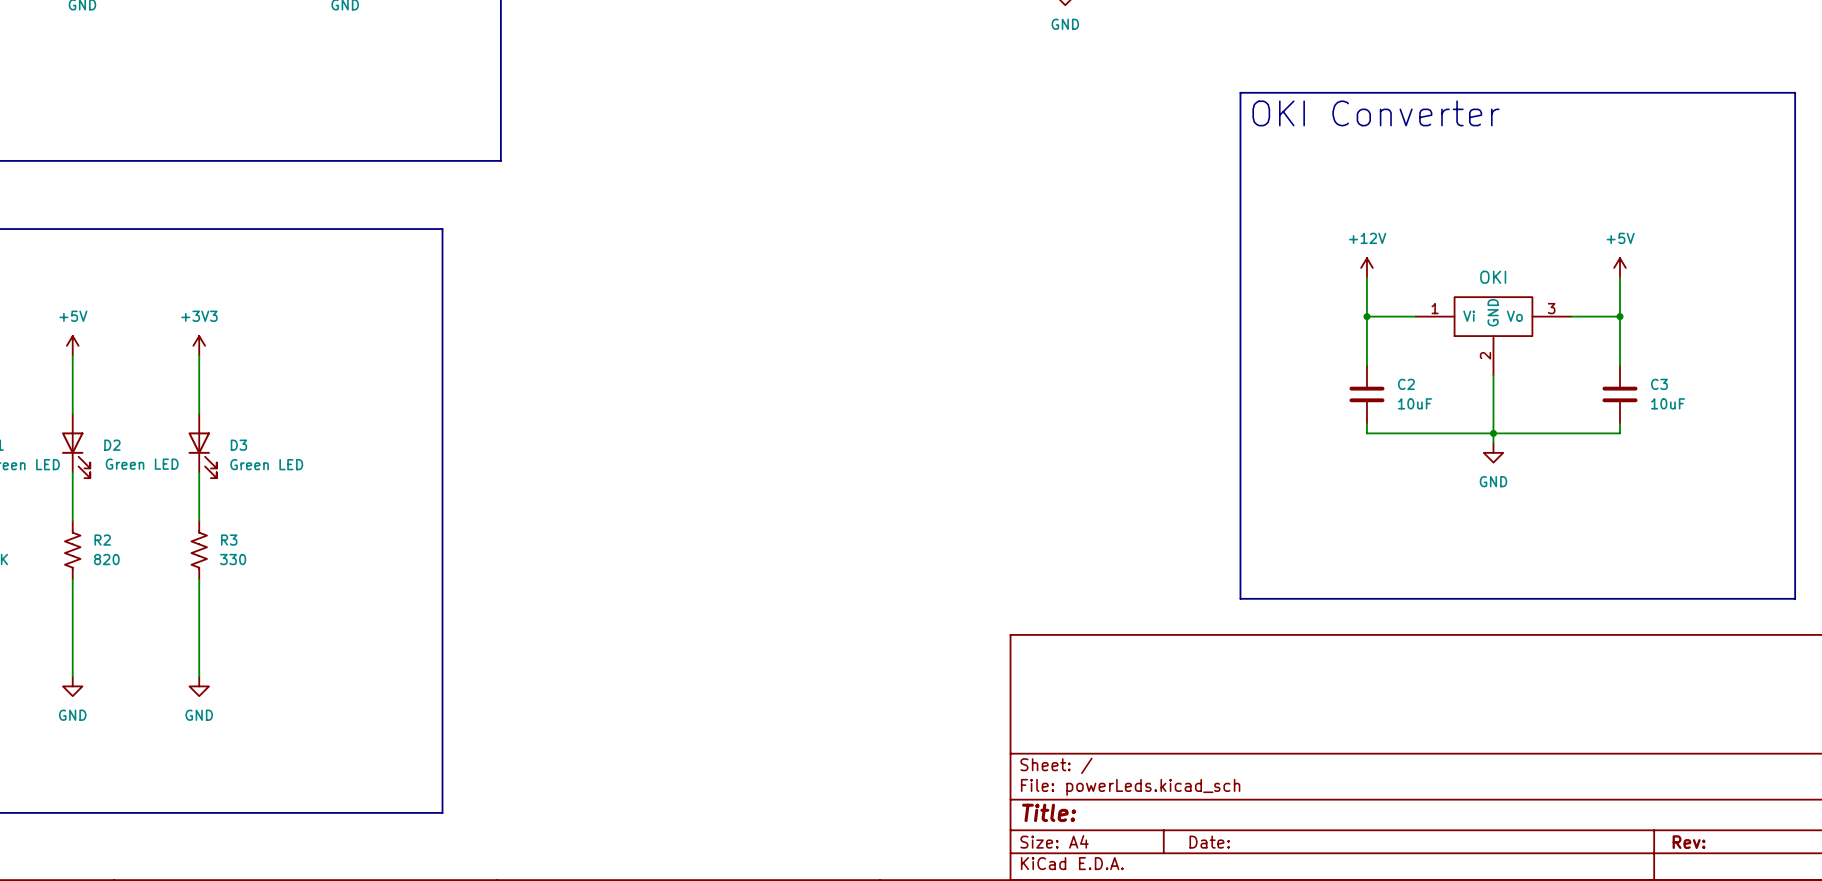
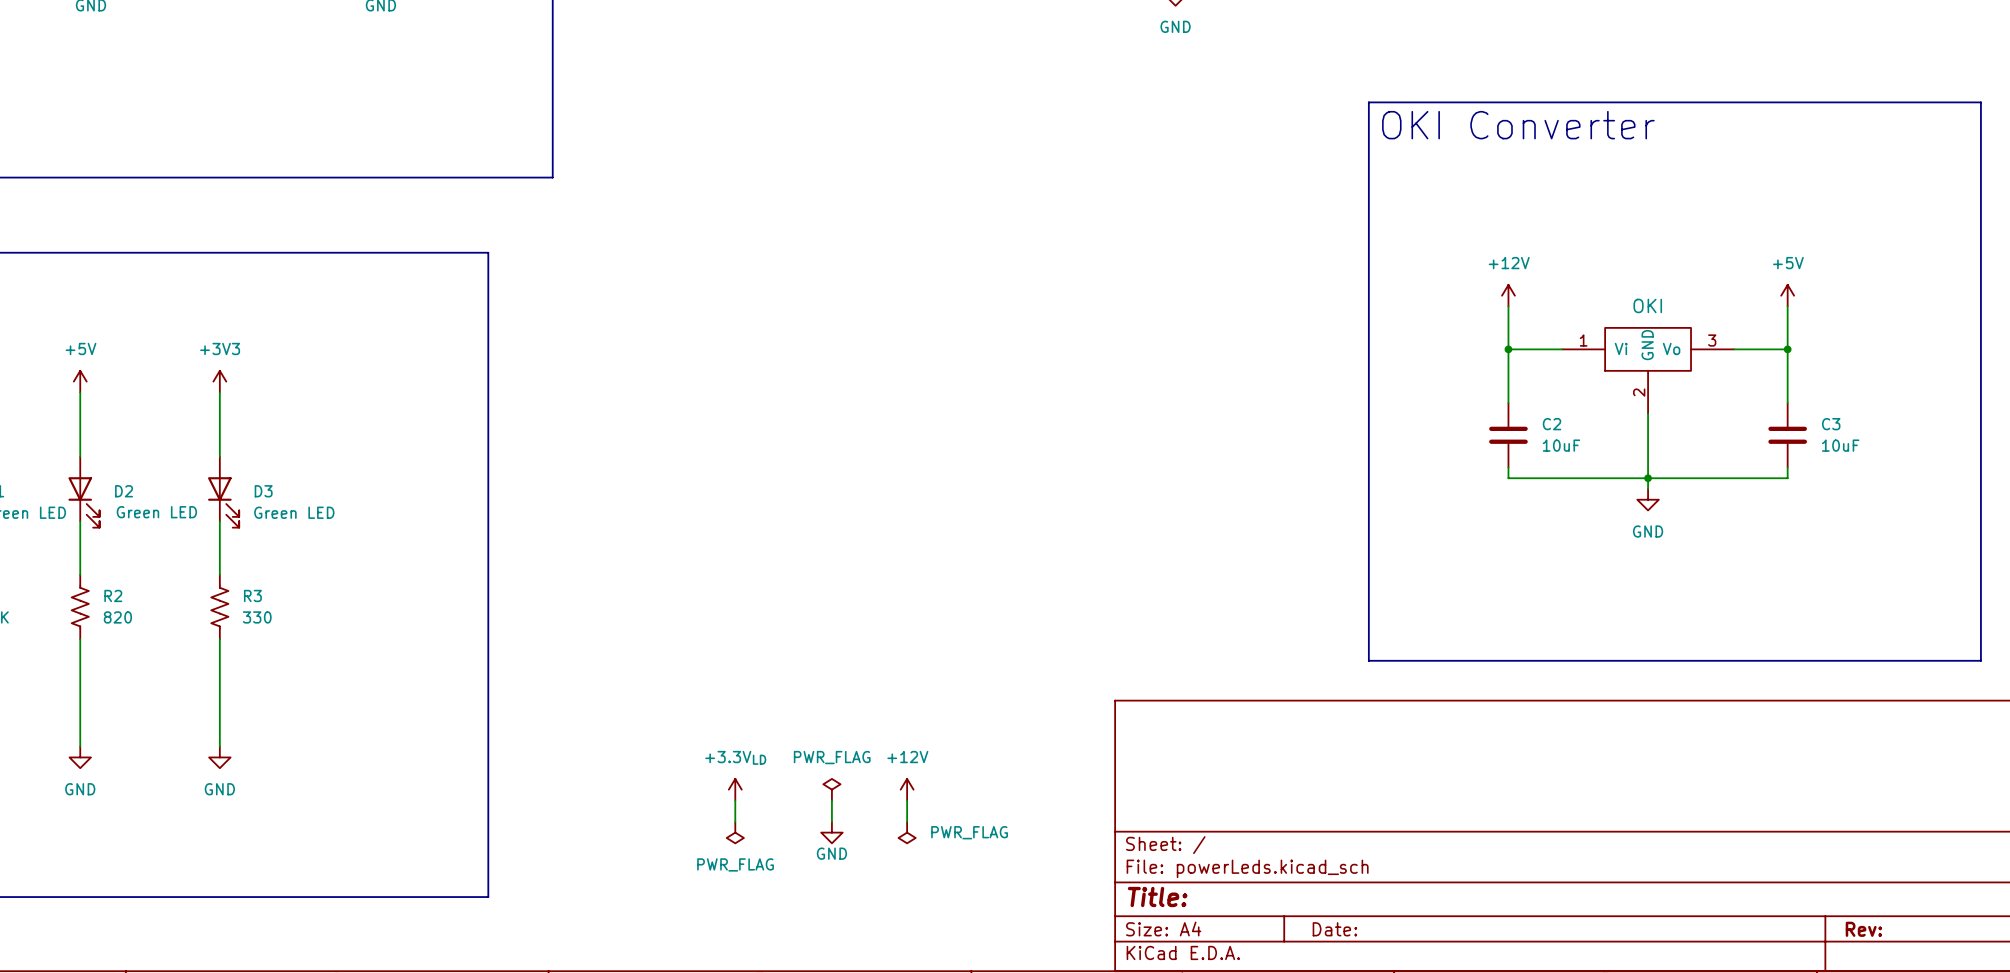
power symbol: none -> +3.3VLD (735, 789)
power symbol: none -> PWR_FLAG (831, 789)
power symbol: none -> +12V (907, 789)
wire: none -> (735, 800) (735, 821)
wire: none -> (831, 800) (831, 821)
wire: none -> (907, 800) (907, 821)
power symbol: none -> PWR_FLAG (735, 832)
power symbol: none -> GND (831, 832)
power symbol: none -> PWR_FLAG (907, 832)

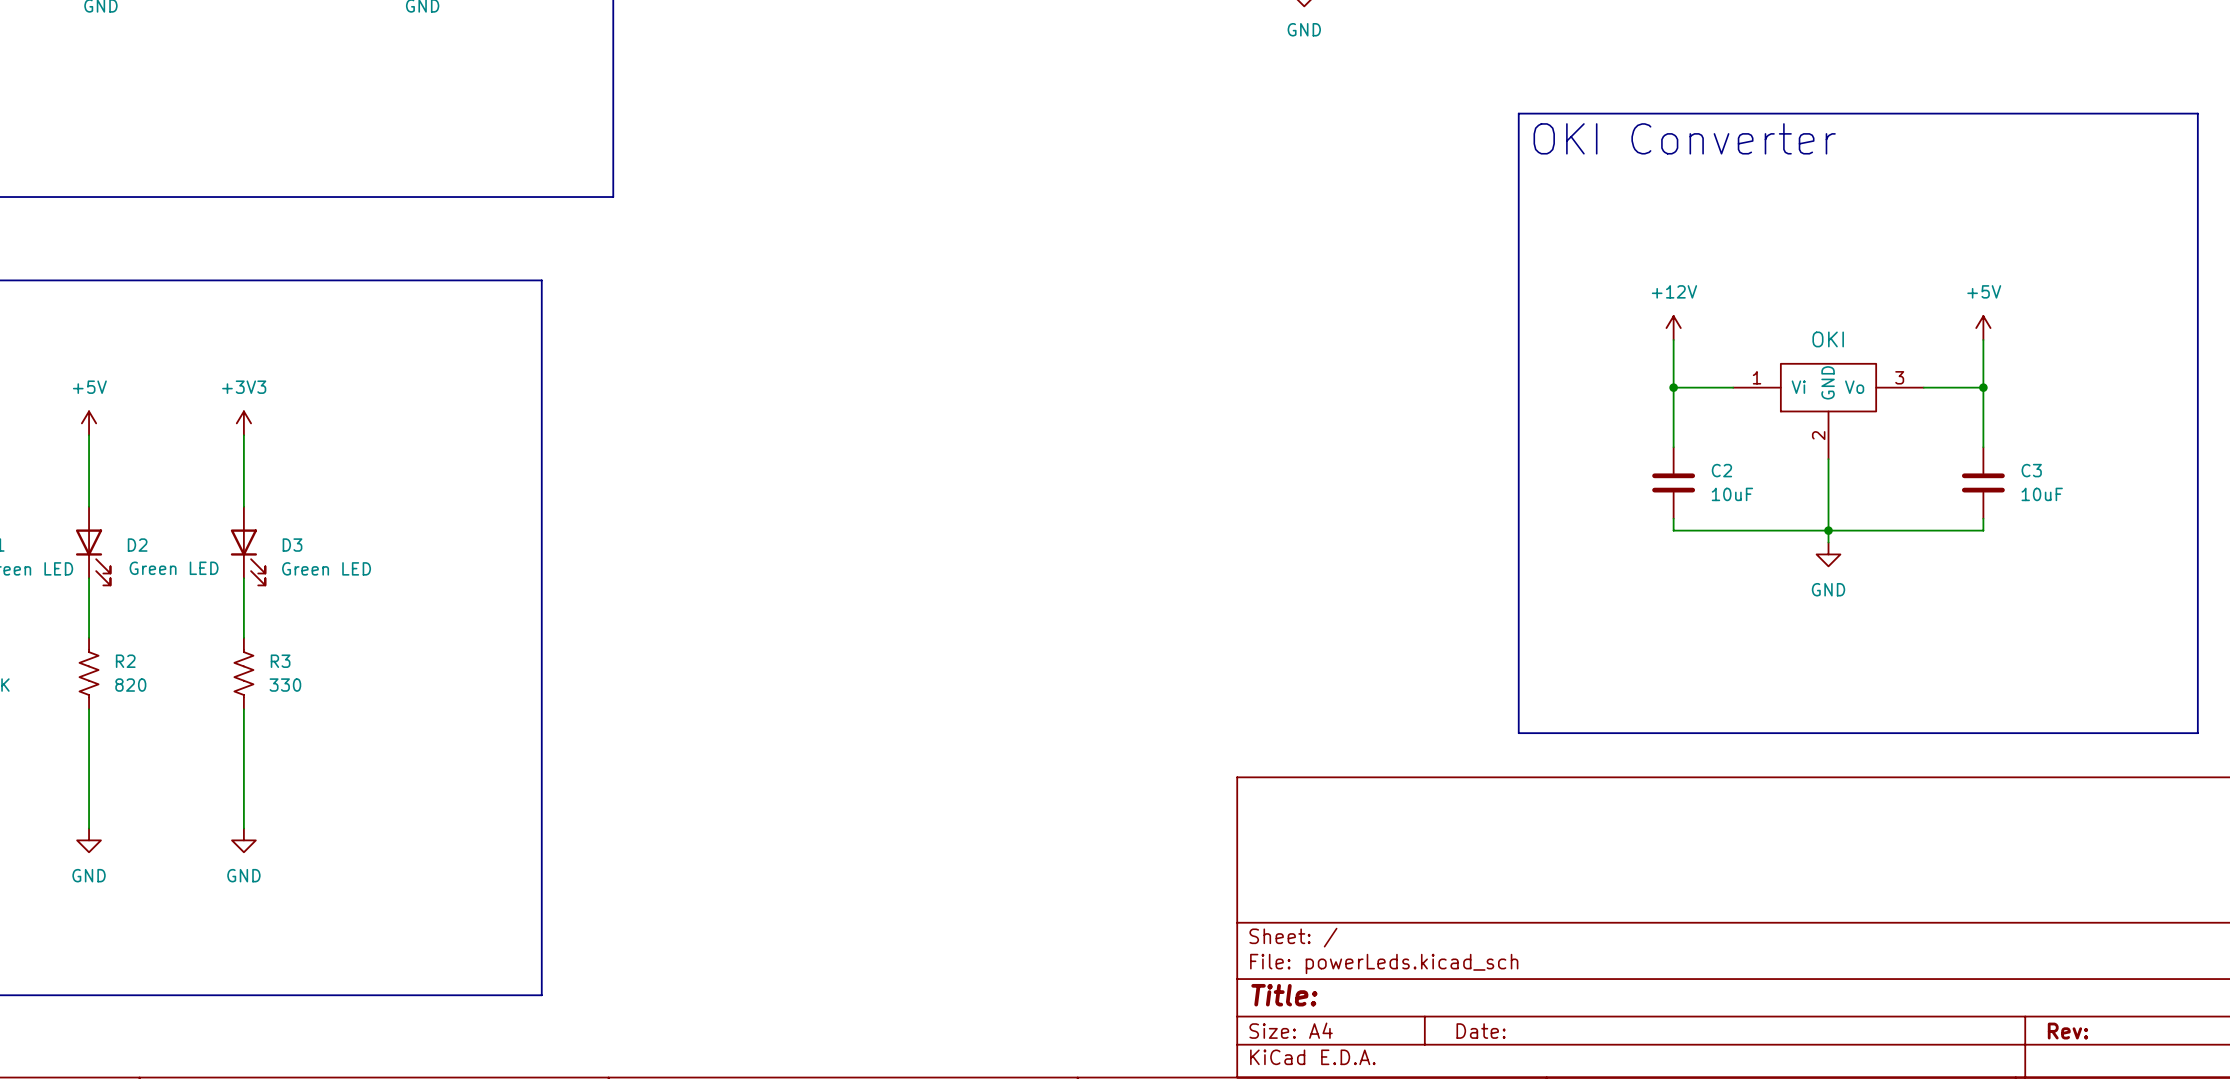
power symbol: +3.3VLD (735, 789) -> none
power symbol: PWR_FLAG (831, 789) -> none
power symbol: +12V (907, 789) -> none
wire: (735, 800) (735, 821) -> none
wire: (831, 800) (831, 821) -> none
wire: (907, 800) (907, 821) -> none
power symbol: PWR_FLAG (735, 832) -> none
power symbol: GND (831, 832) -> none
power symbol: PWR_FLAG (907, 832) -> none

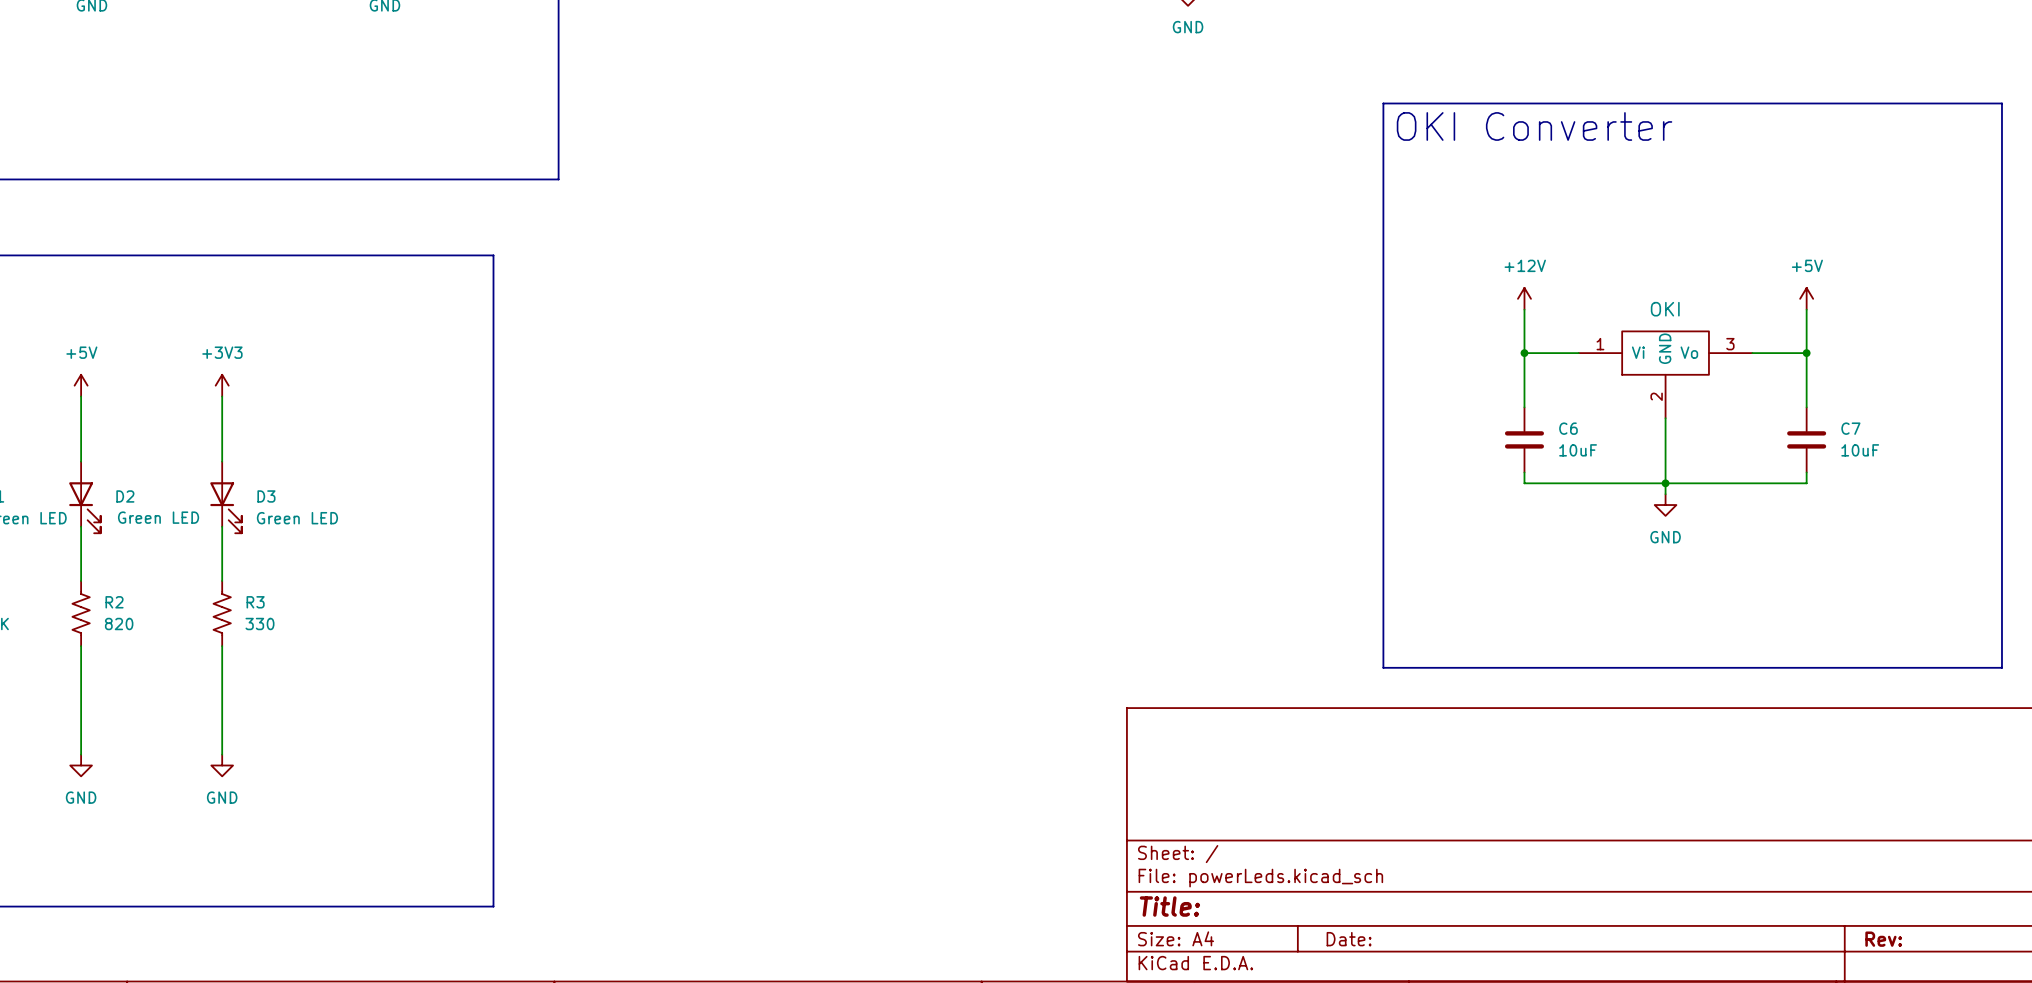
C2 name: C2 (1721, 470) -> C6 (1568, 428)
C3 name: C3 (2031, 470) -> C7 (1850, 428)

